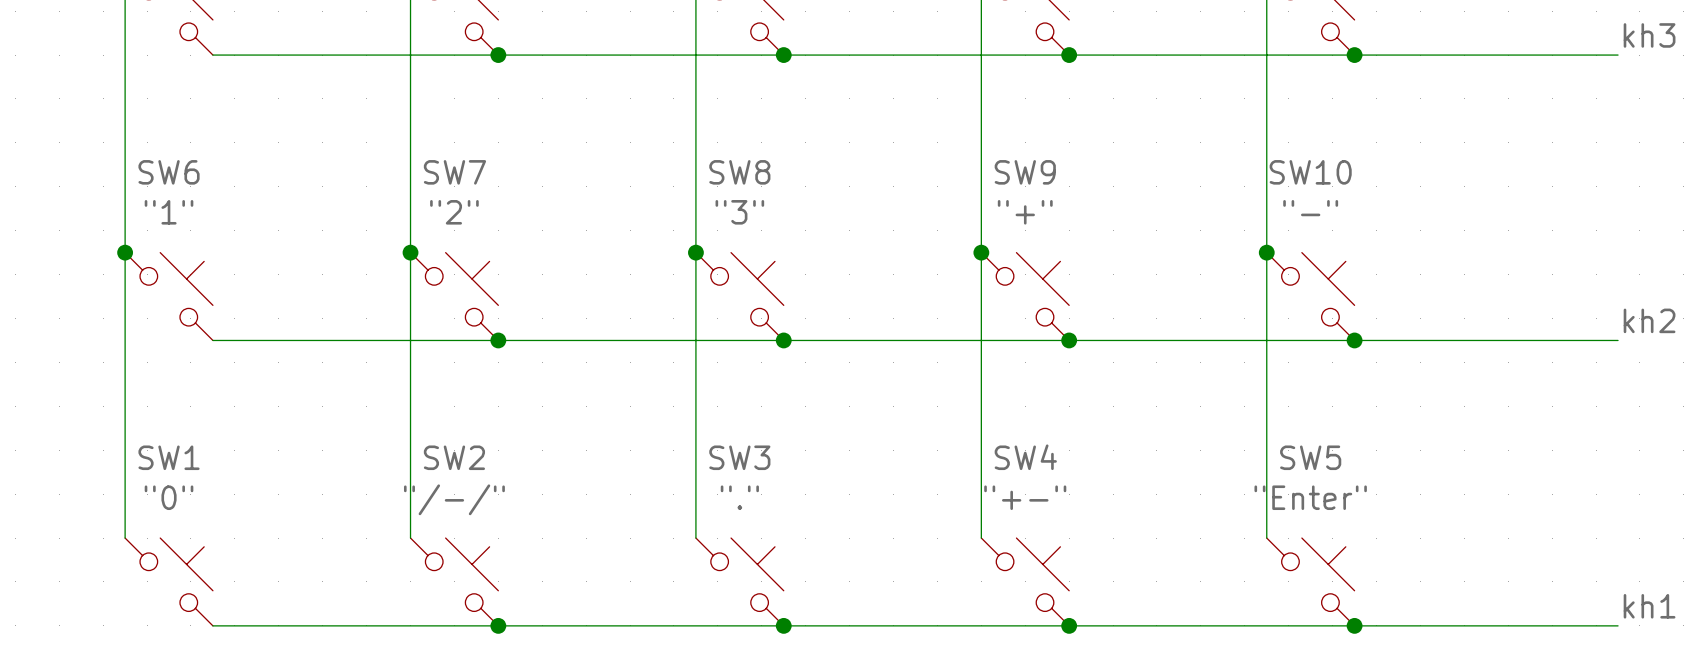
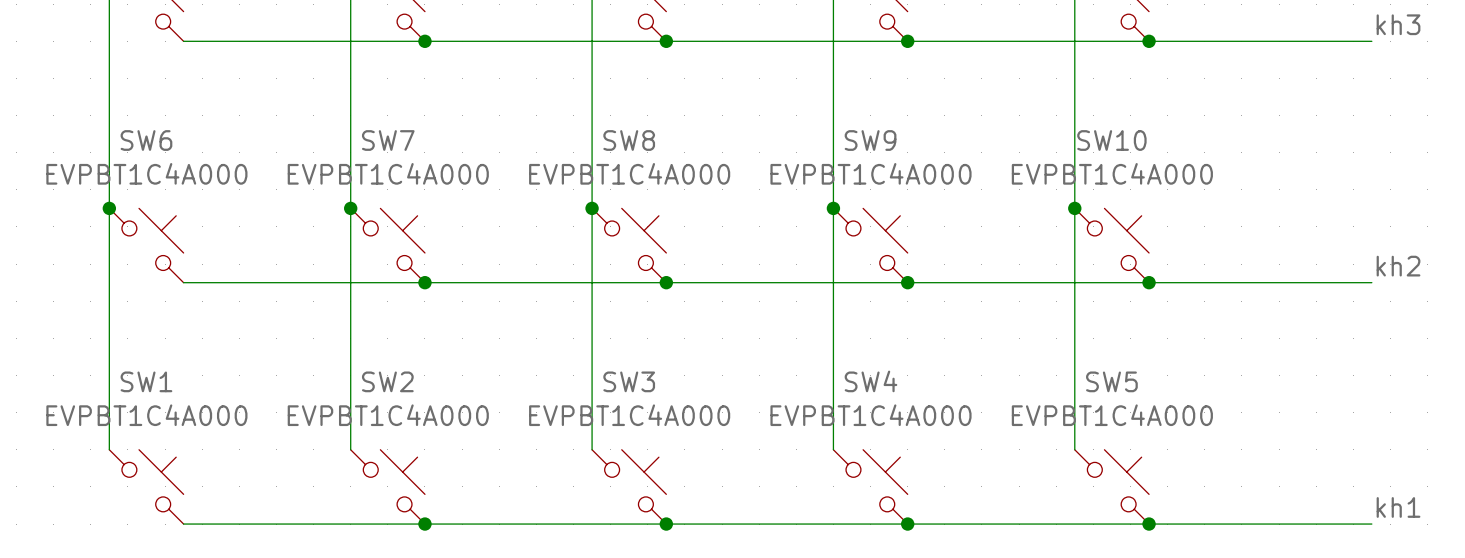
SW10 value: "-" (1310, 208) -> EVPBT1C4A000 (1112, 173)
SW6 value: "1" (169, 212) -> EVPBT1C4A000 (146, 173)
SW7 value: "2" (454, 212) -> EVPBT1C4A000 (388, 173)
SW8 value: "3" (739, 212) -> EVPBT1C4A000 (629, 173)
SW9 value: "+" (1025, 212) -> EVPBT1C4A000 (871, 173)
SW1 value: "0" (169, 497) -> EVPBT1C4A000 (146, 415)
SW3 value: "." (739, 497) -> EVPBT1C4A000 (629, 415)
SW4 value: "+-" (1025, 497) -> EVPBT1C4A000 (871, 415)
SW5 value: "Enter" (1310, 497) -> EVPBT1C4A000 (1112, 415)
SW2 value: "/-/" (454, 499) -> EVPBT1C4A000 (388, 415)

